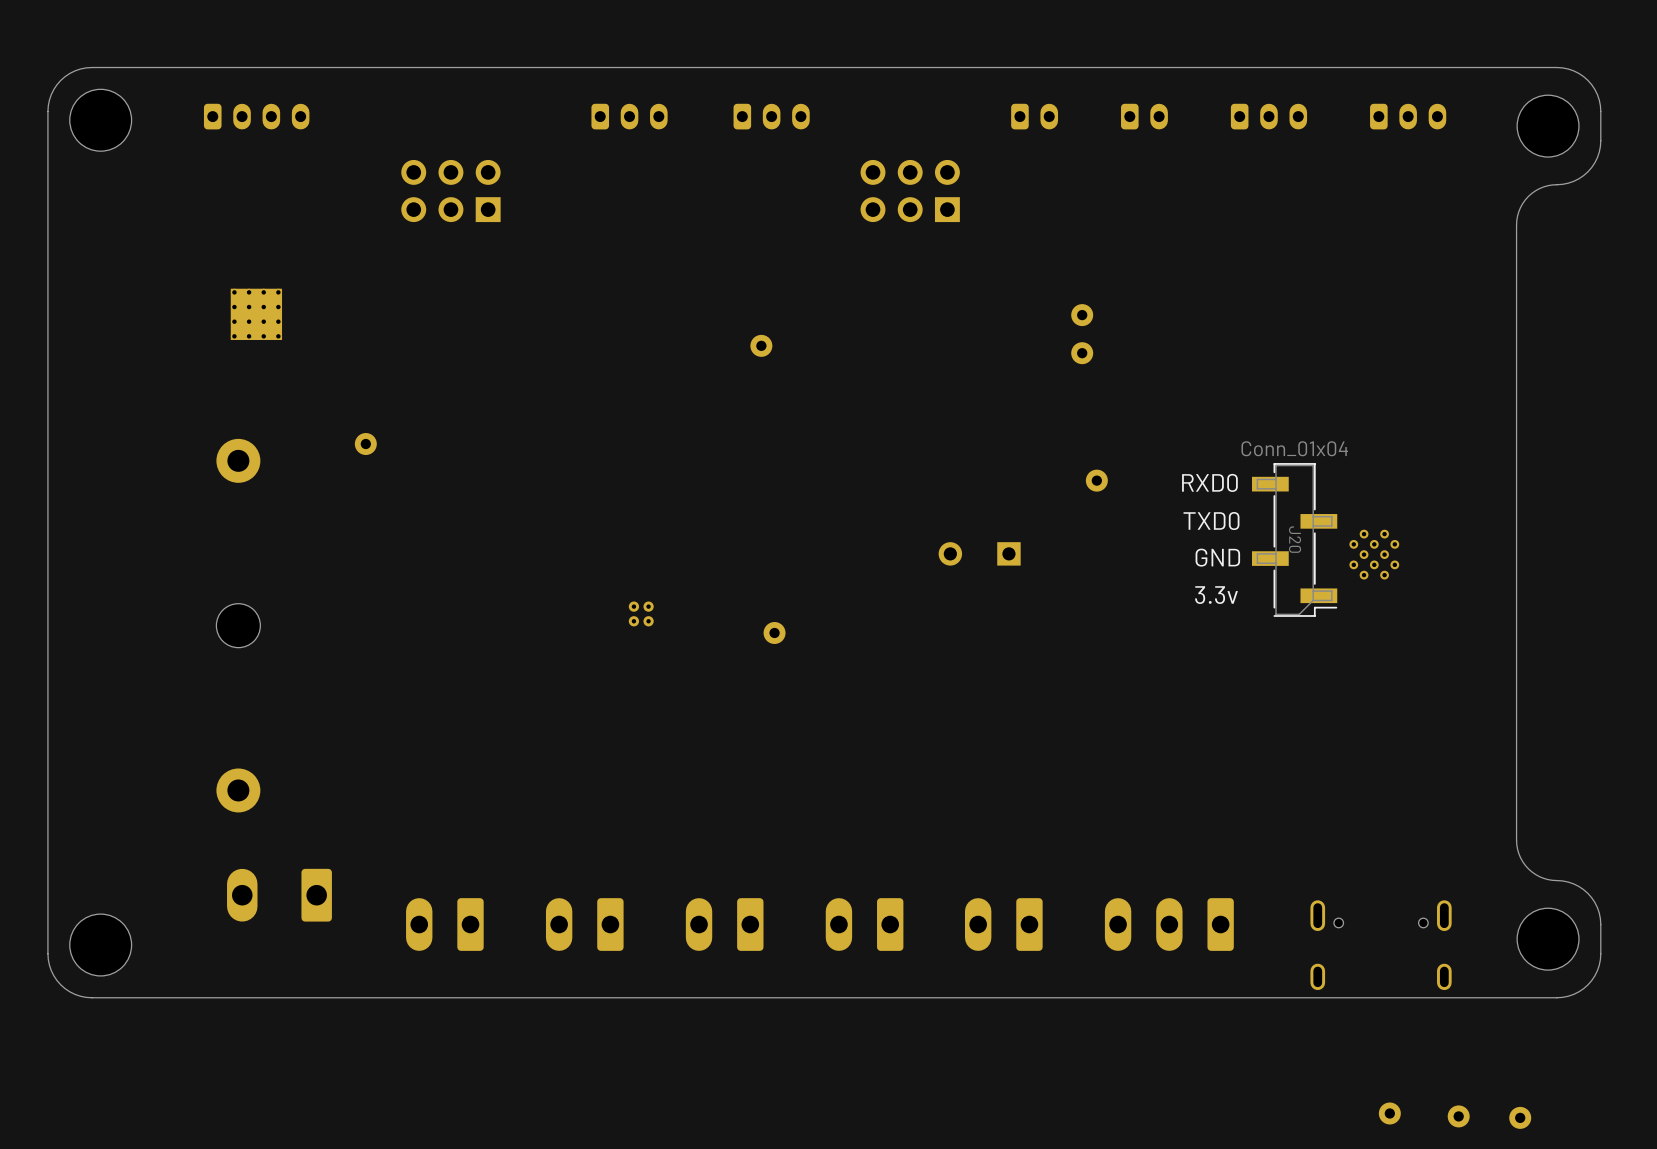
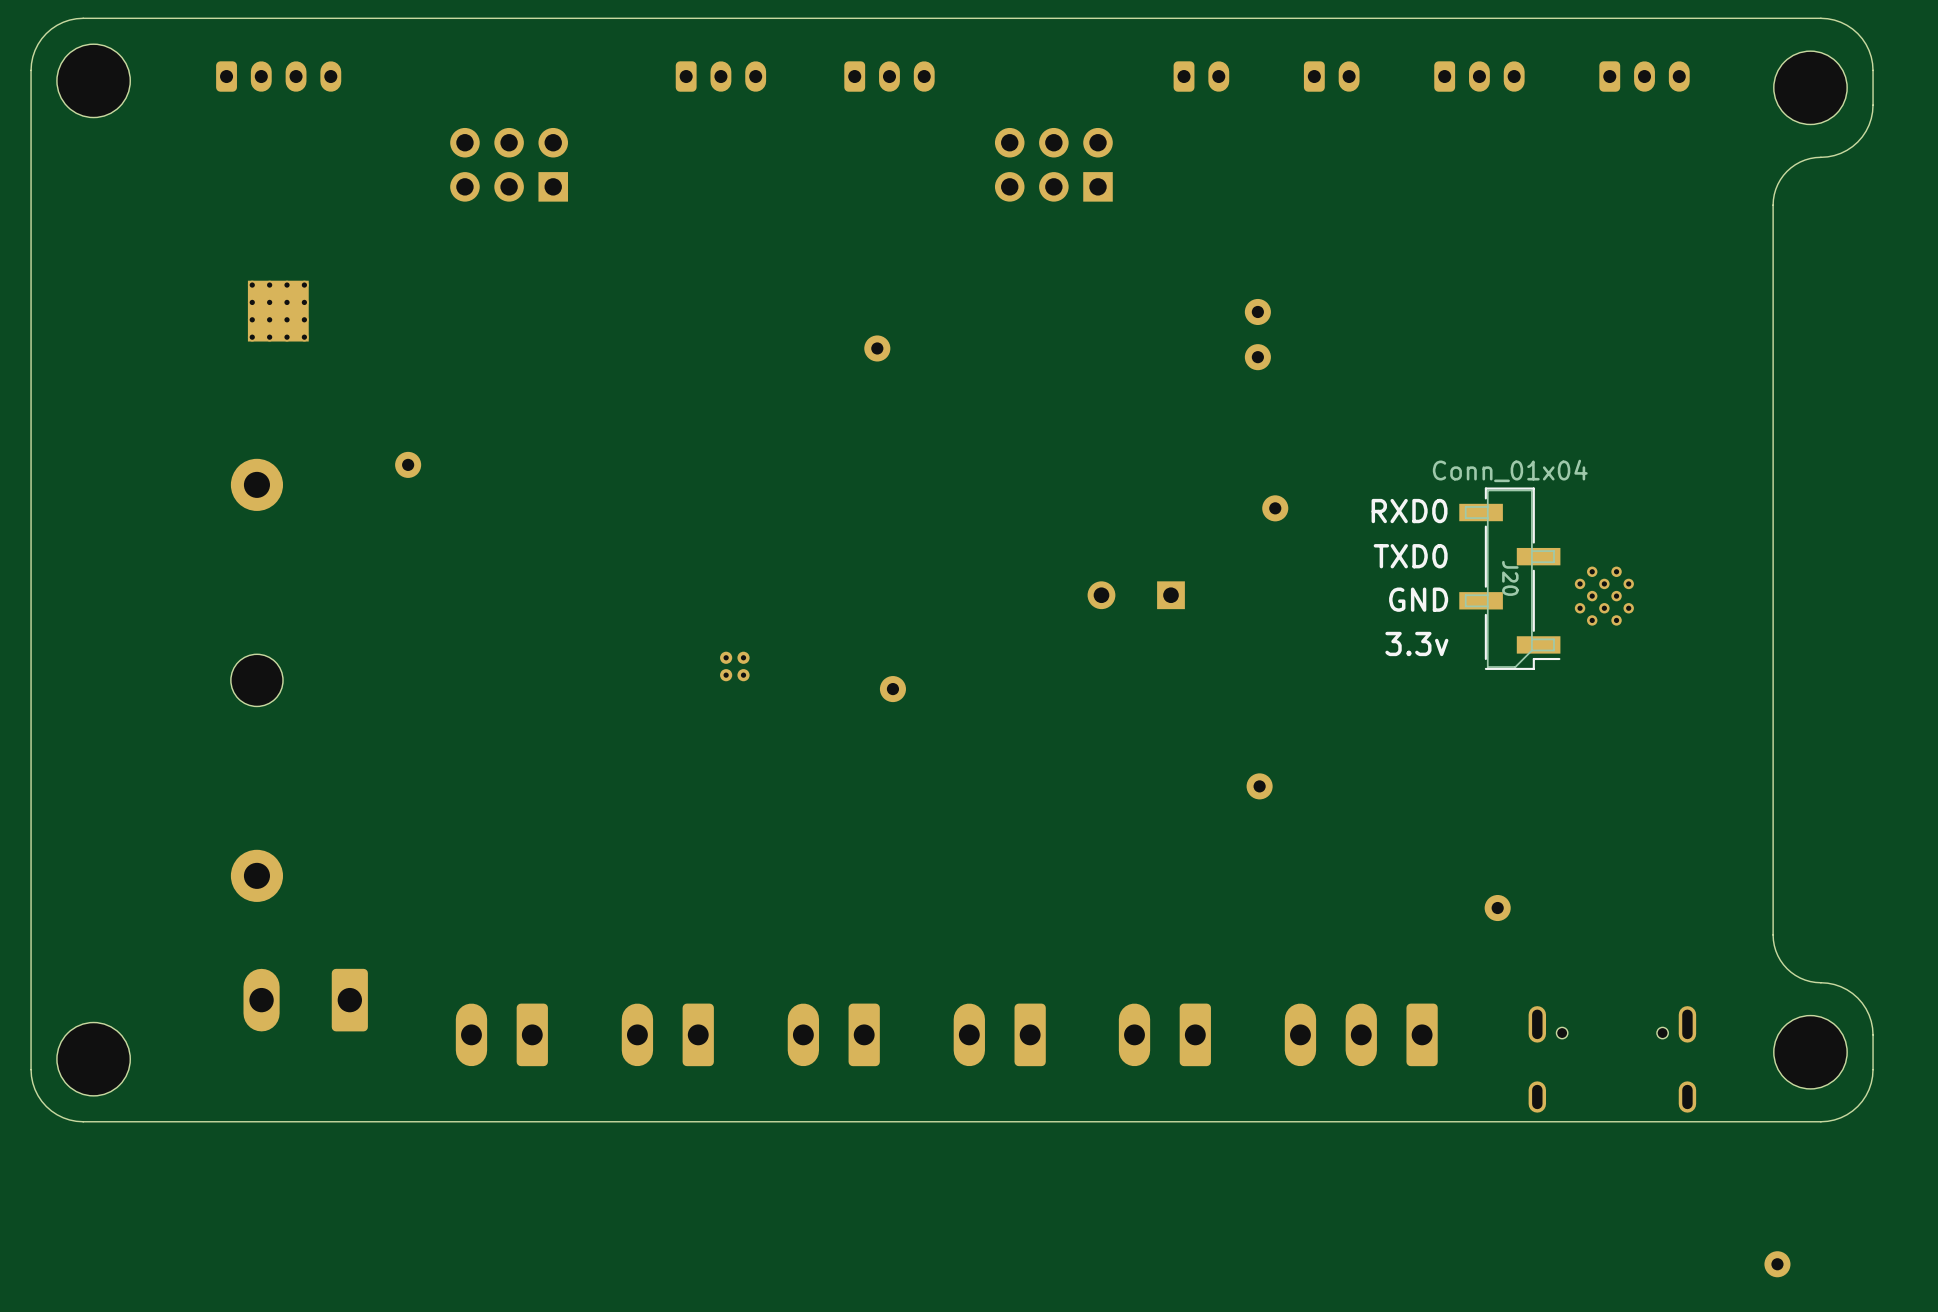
part: none -> (1259, 786)
part: none -> (1497, 908)
part: (1389, 1113) -> none
part: (1458, 1116) -> none

